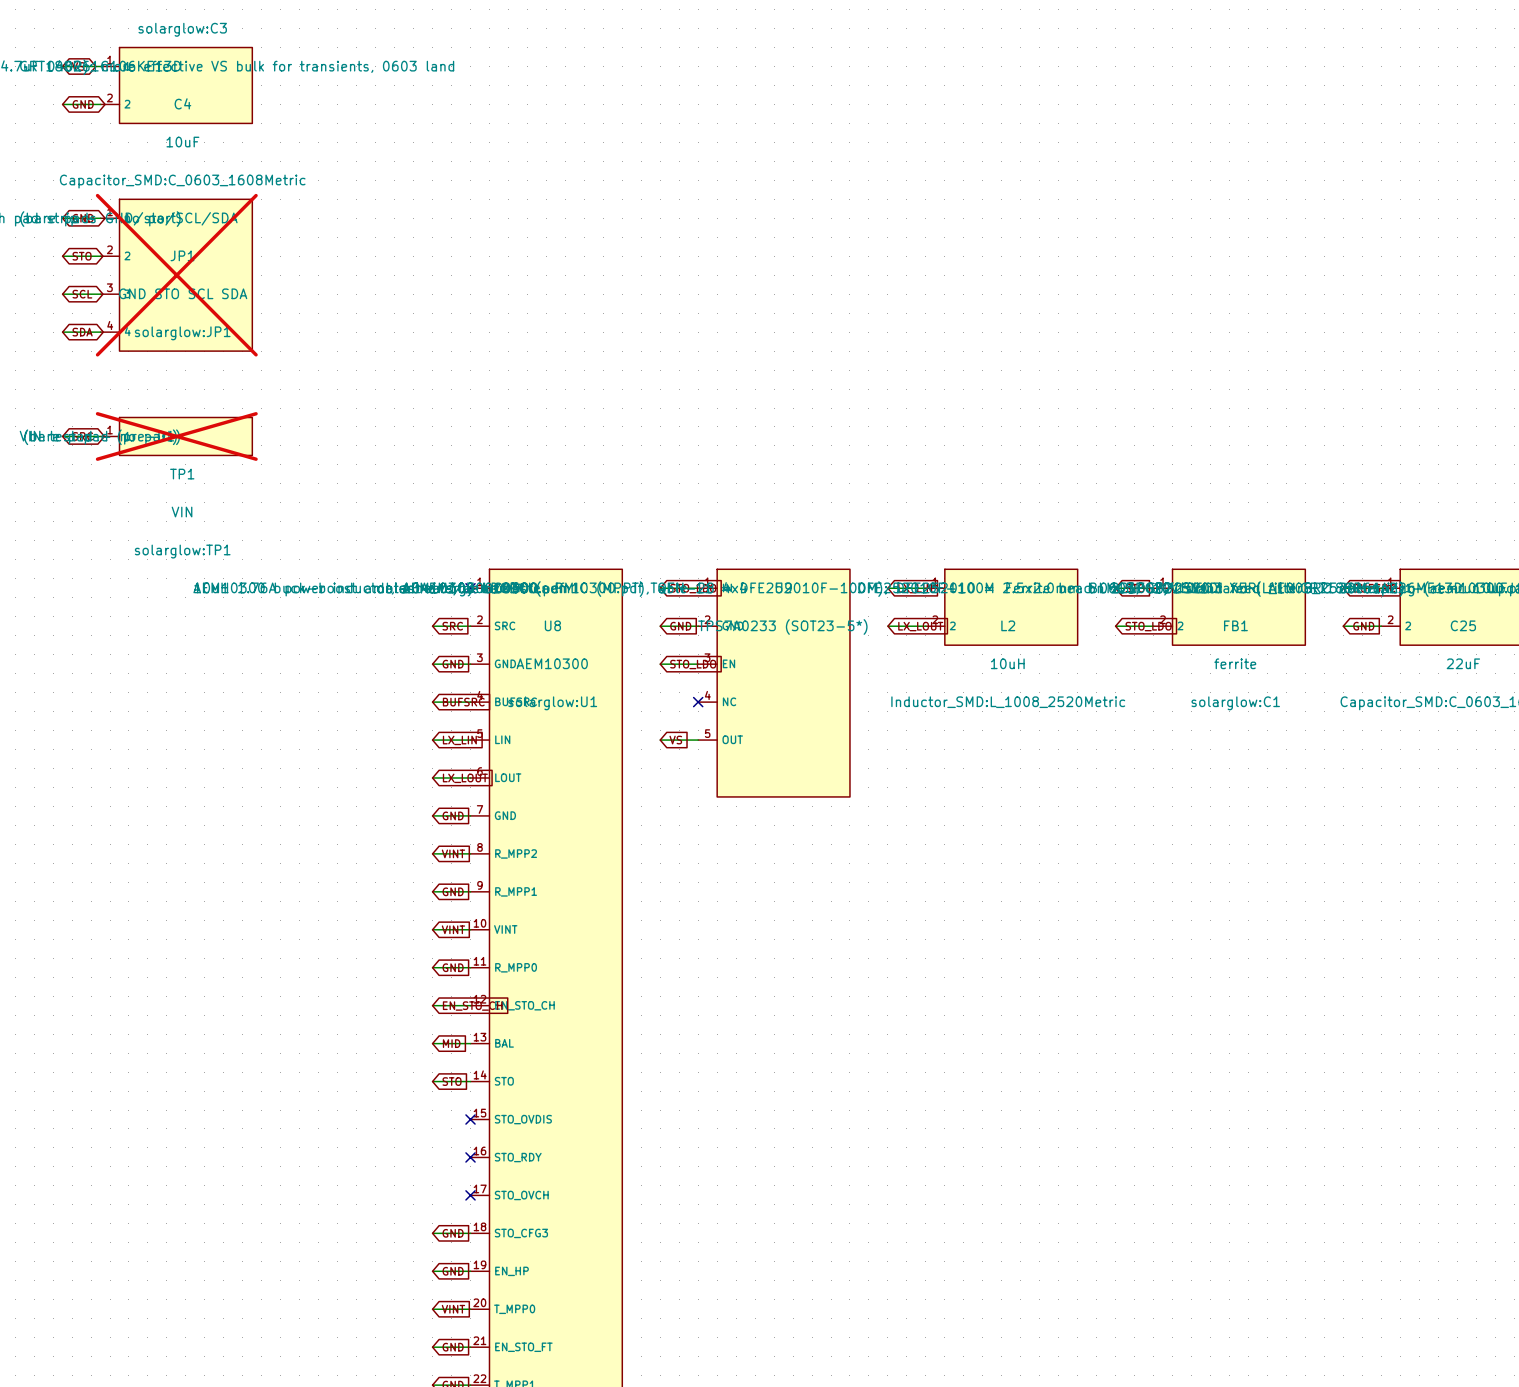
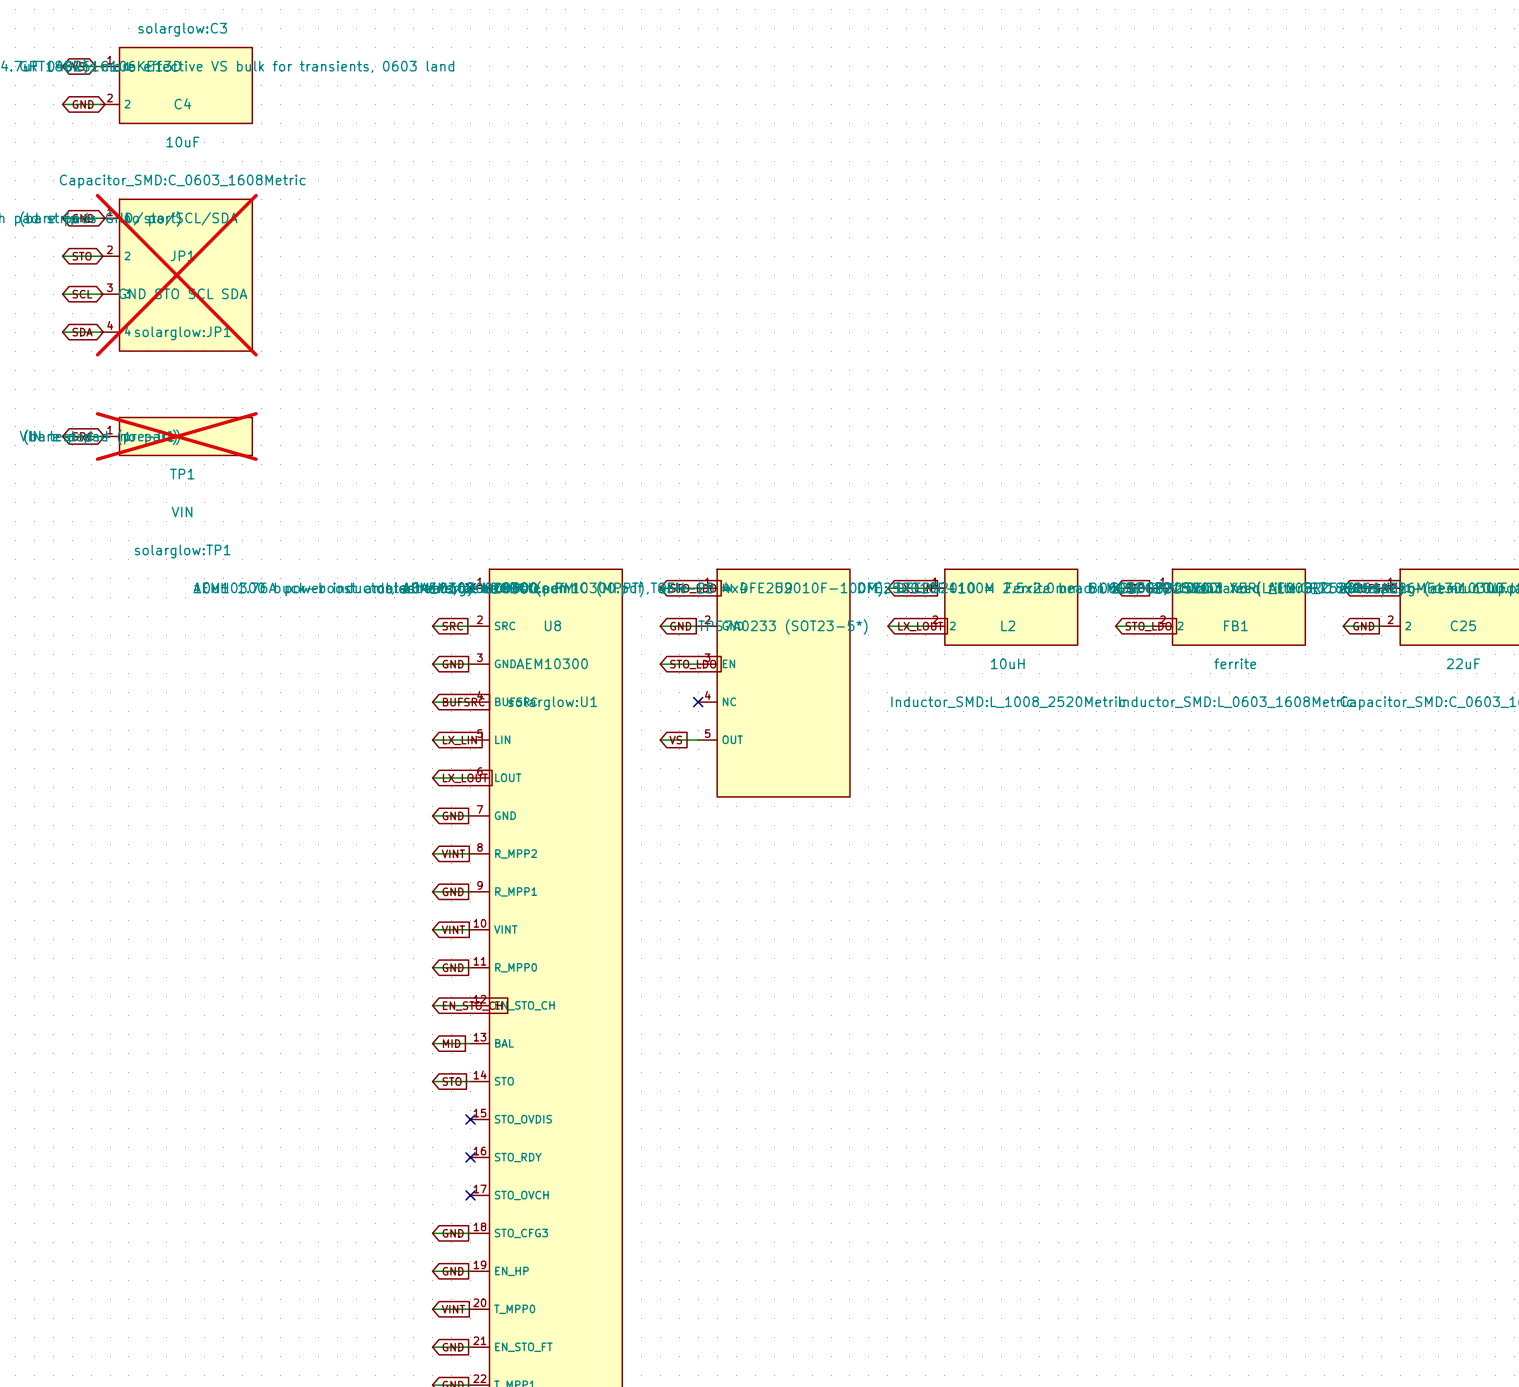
FB1 text: solarglow:C1 (1235, 703) -> Inductor_SMD:L_0603_1608Metric (1235, 702)

